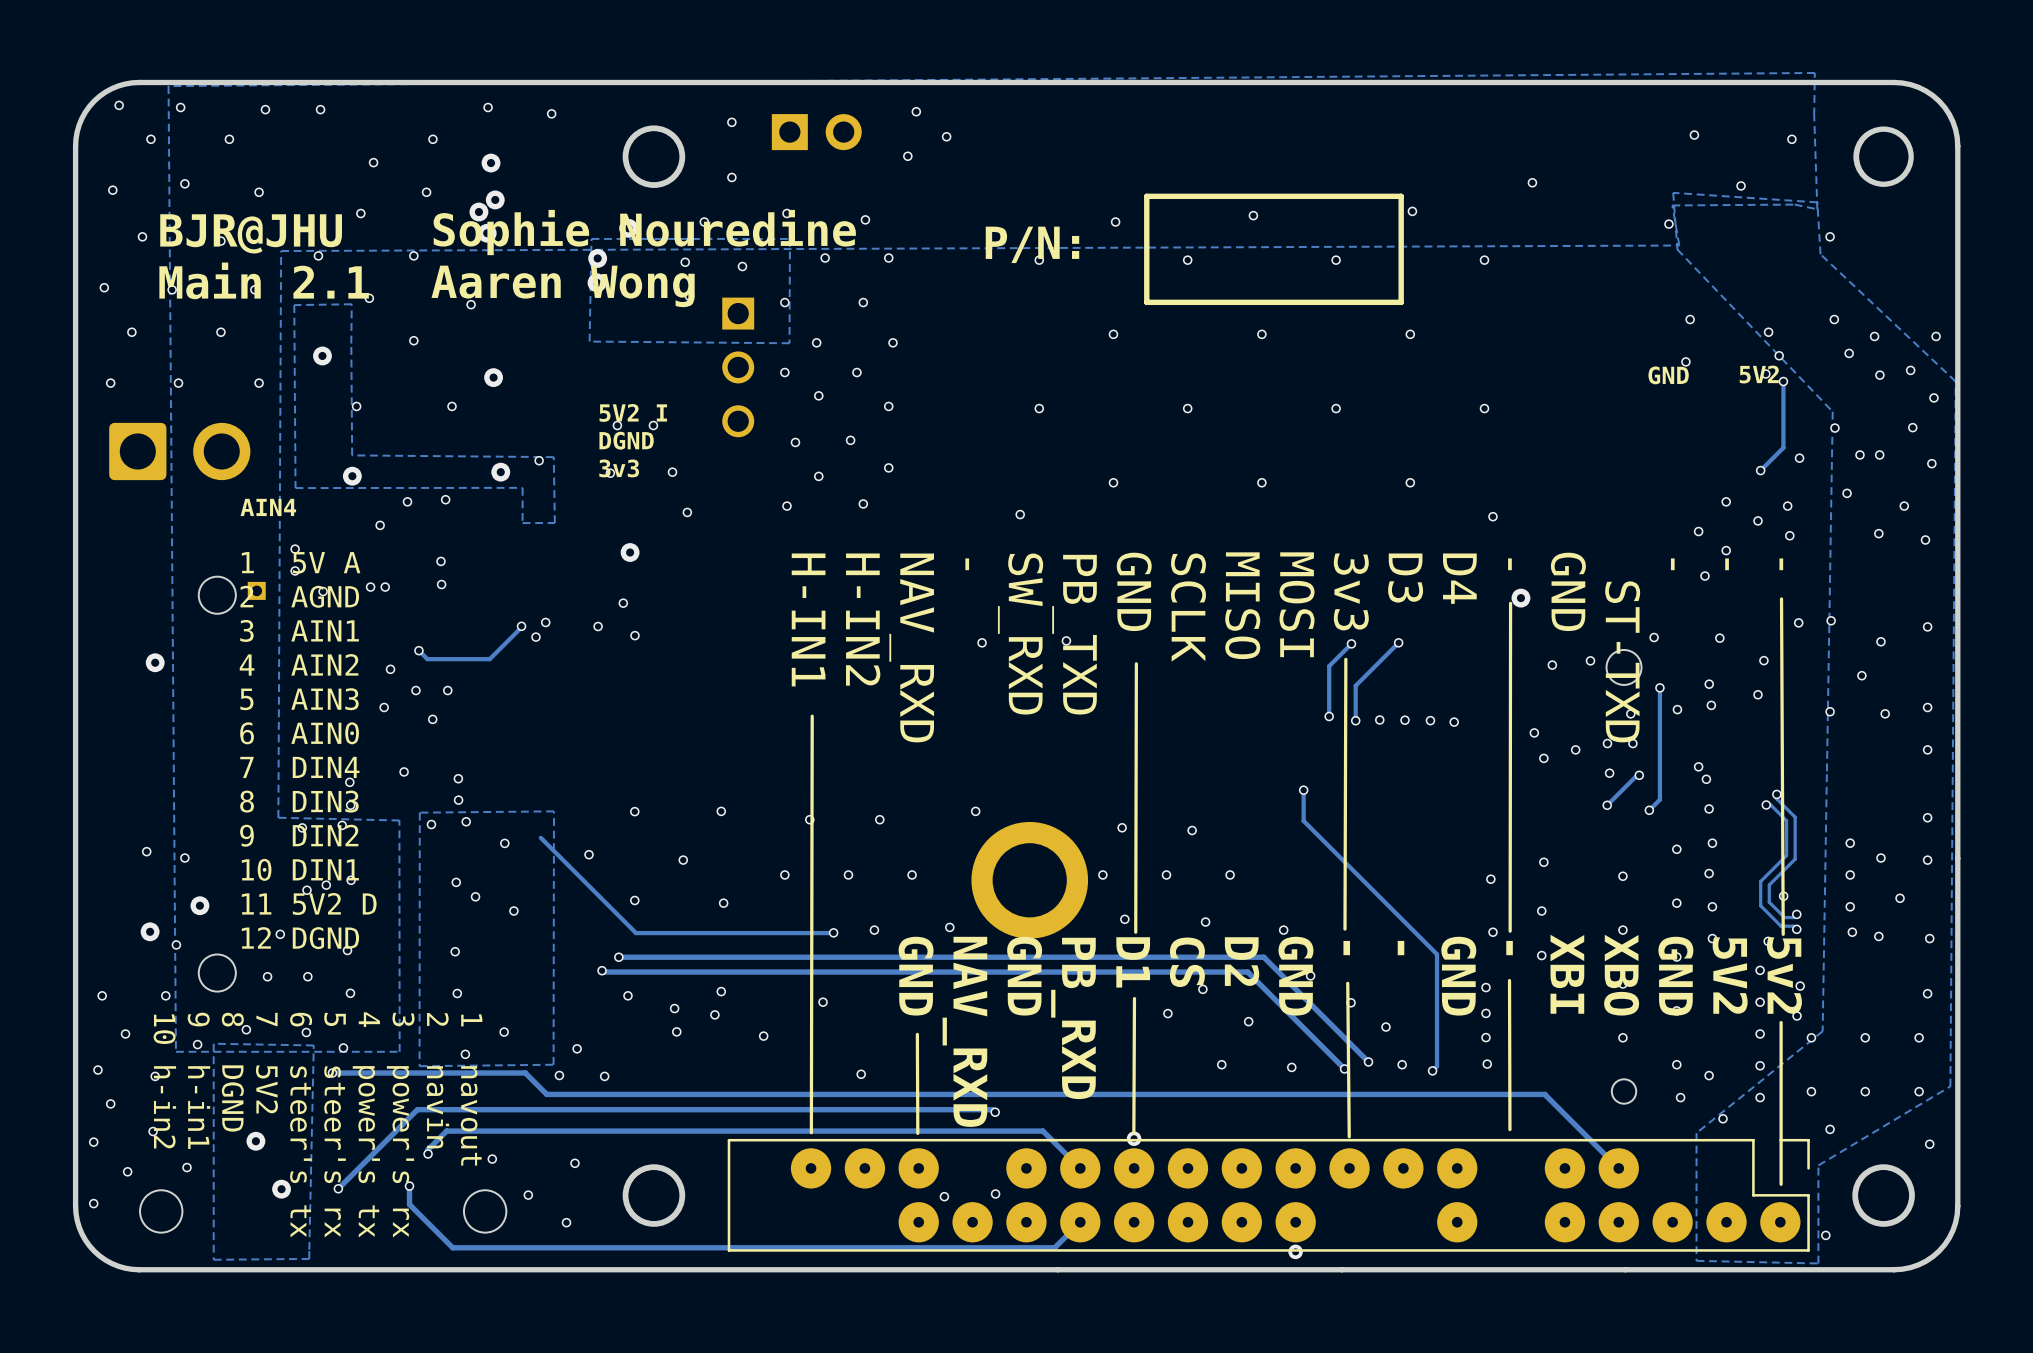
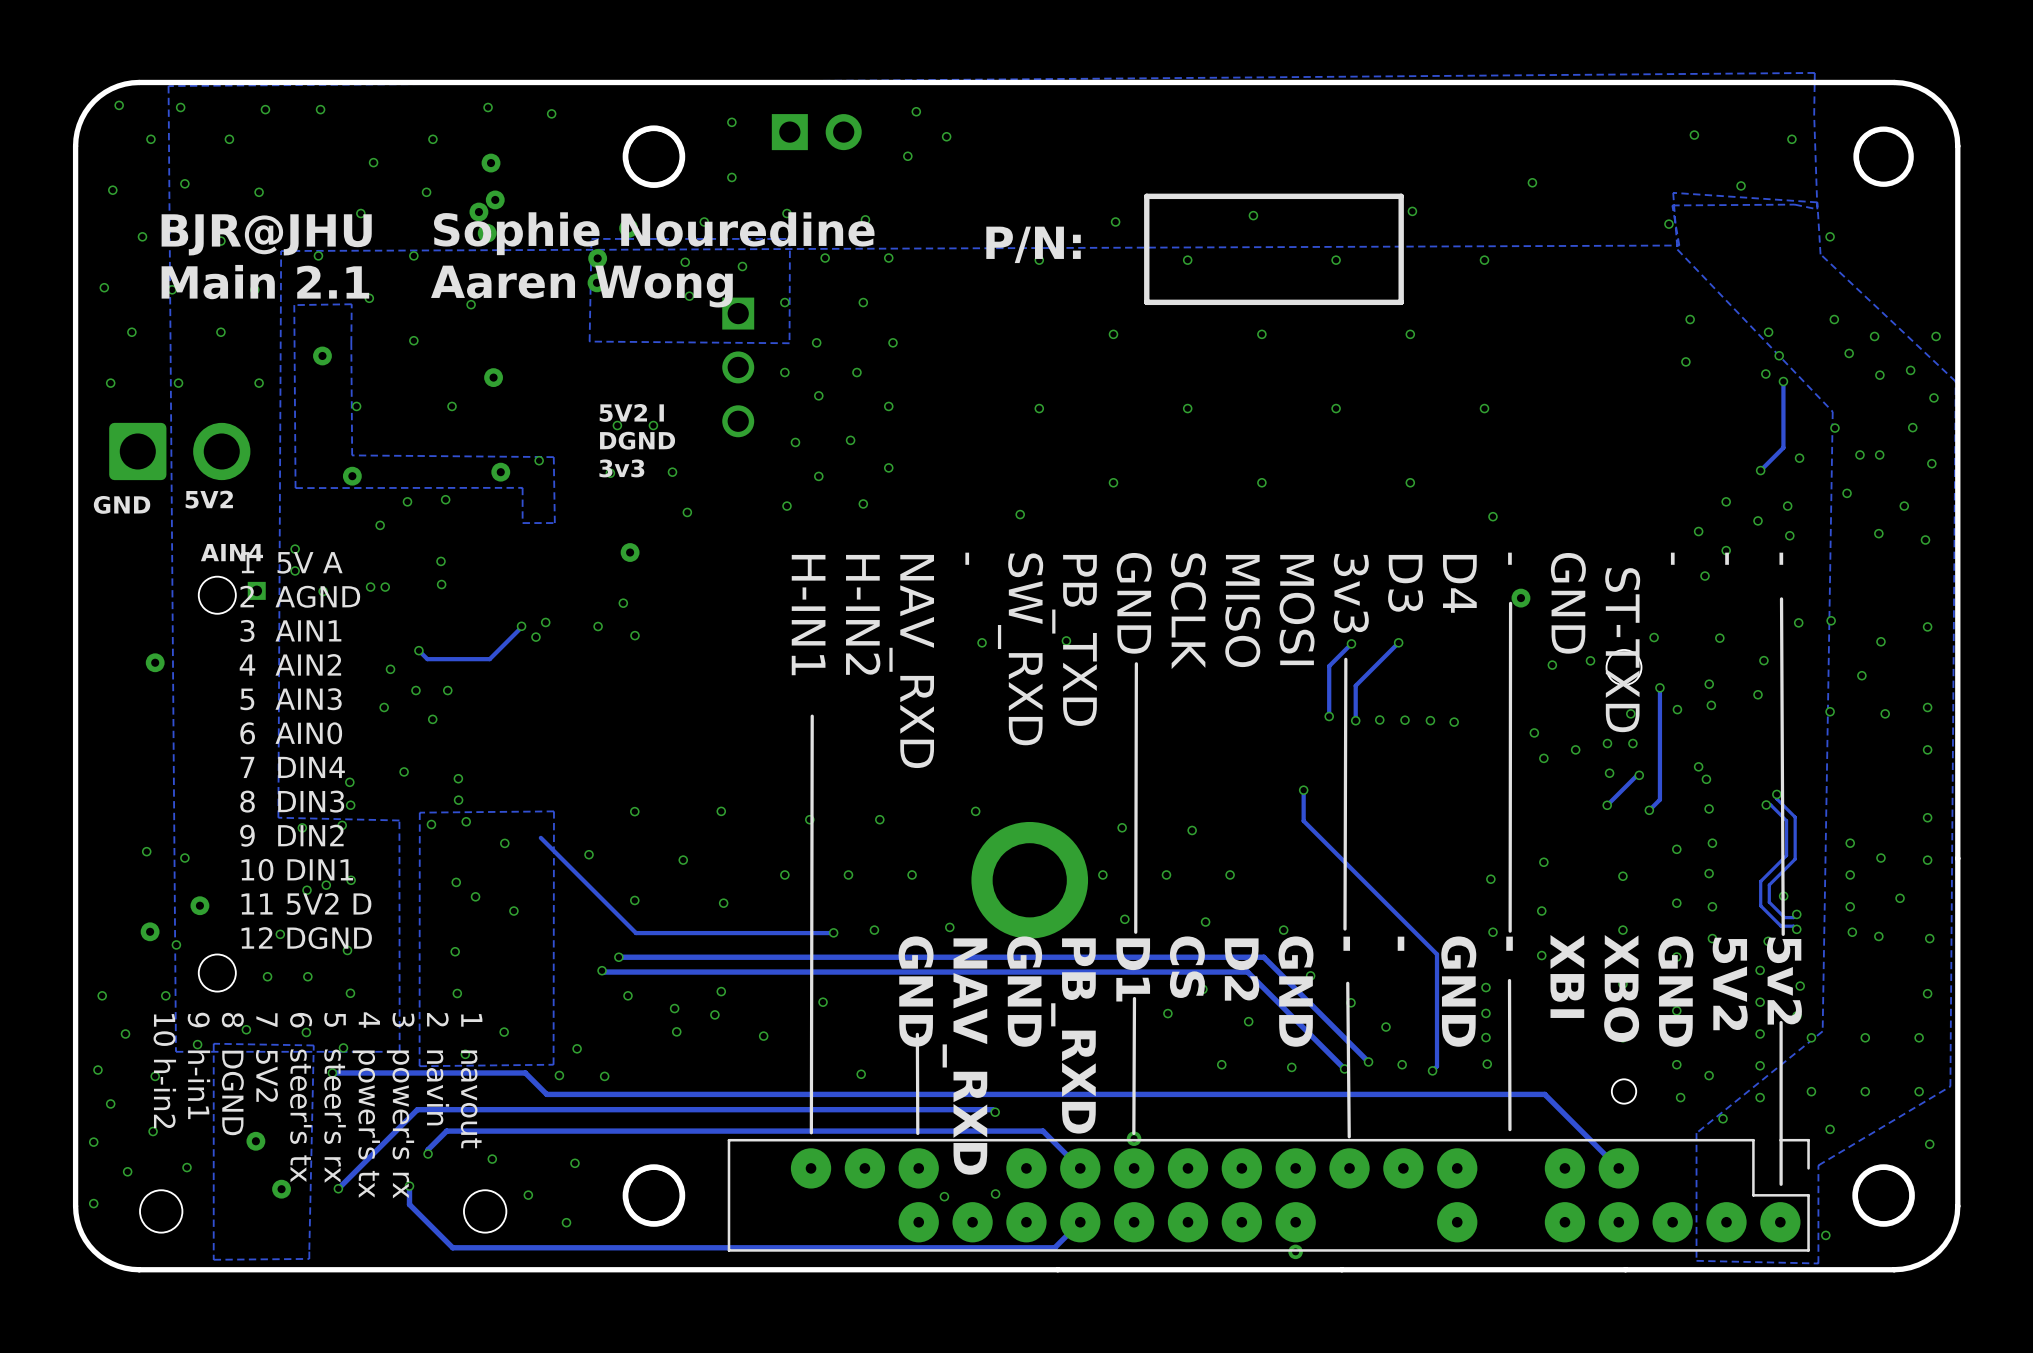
text: 5V2 (1759, 374) -> none
text: GND (1668, 375) -> none
text: none -> 5V2 (209, 499)
text: none -> GND (122, 504)
text position: AIN4 (268, 507) -> AIN4 (231, 552)

